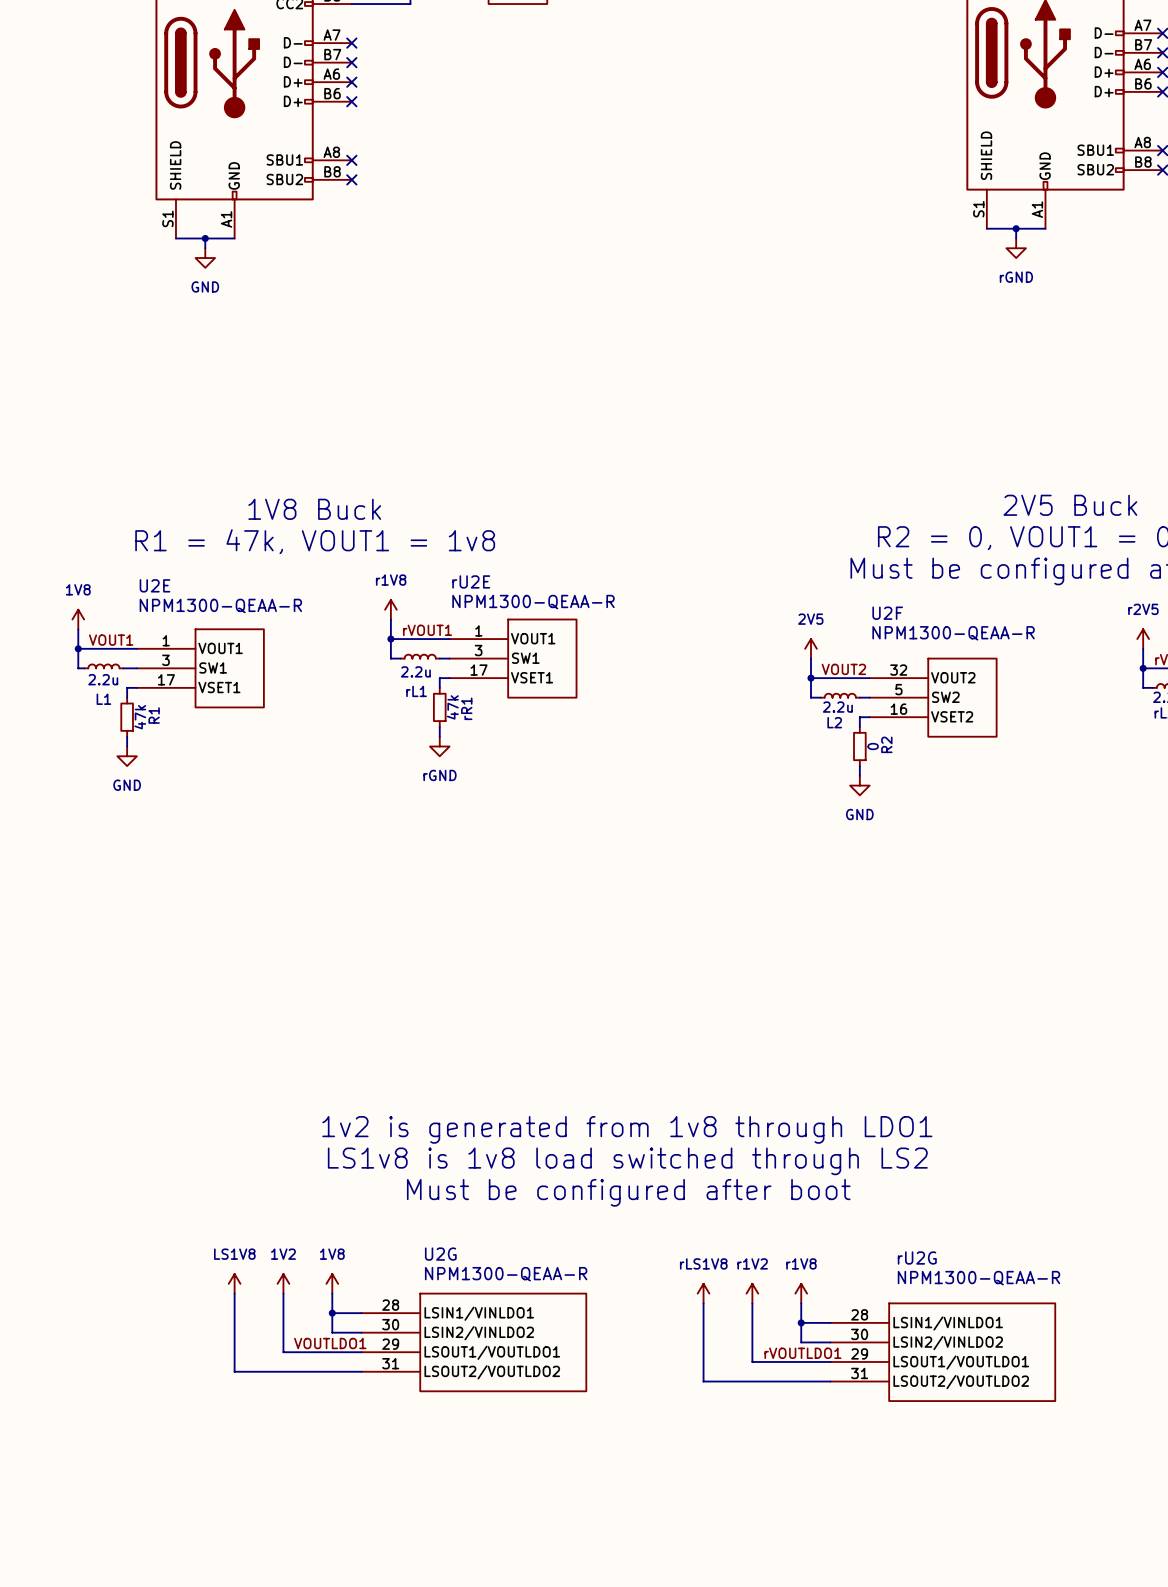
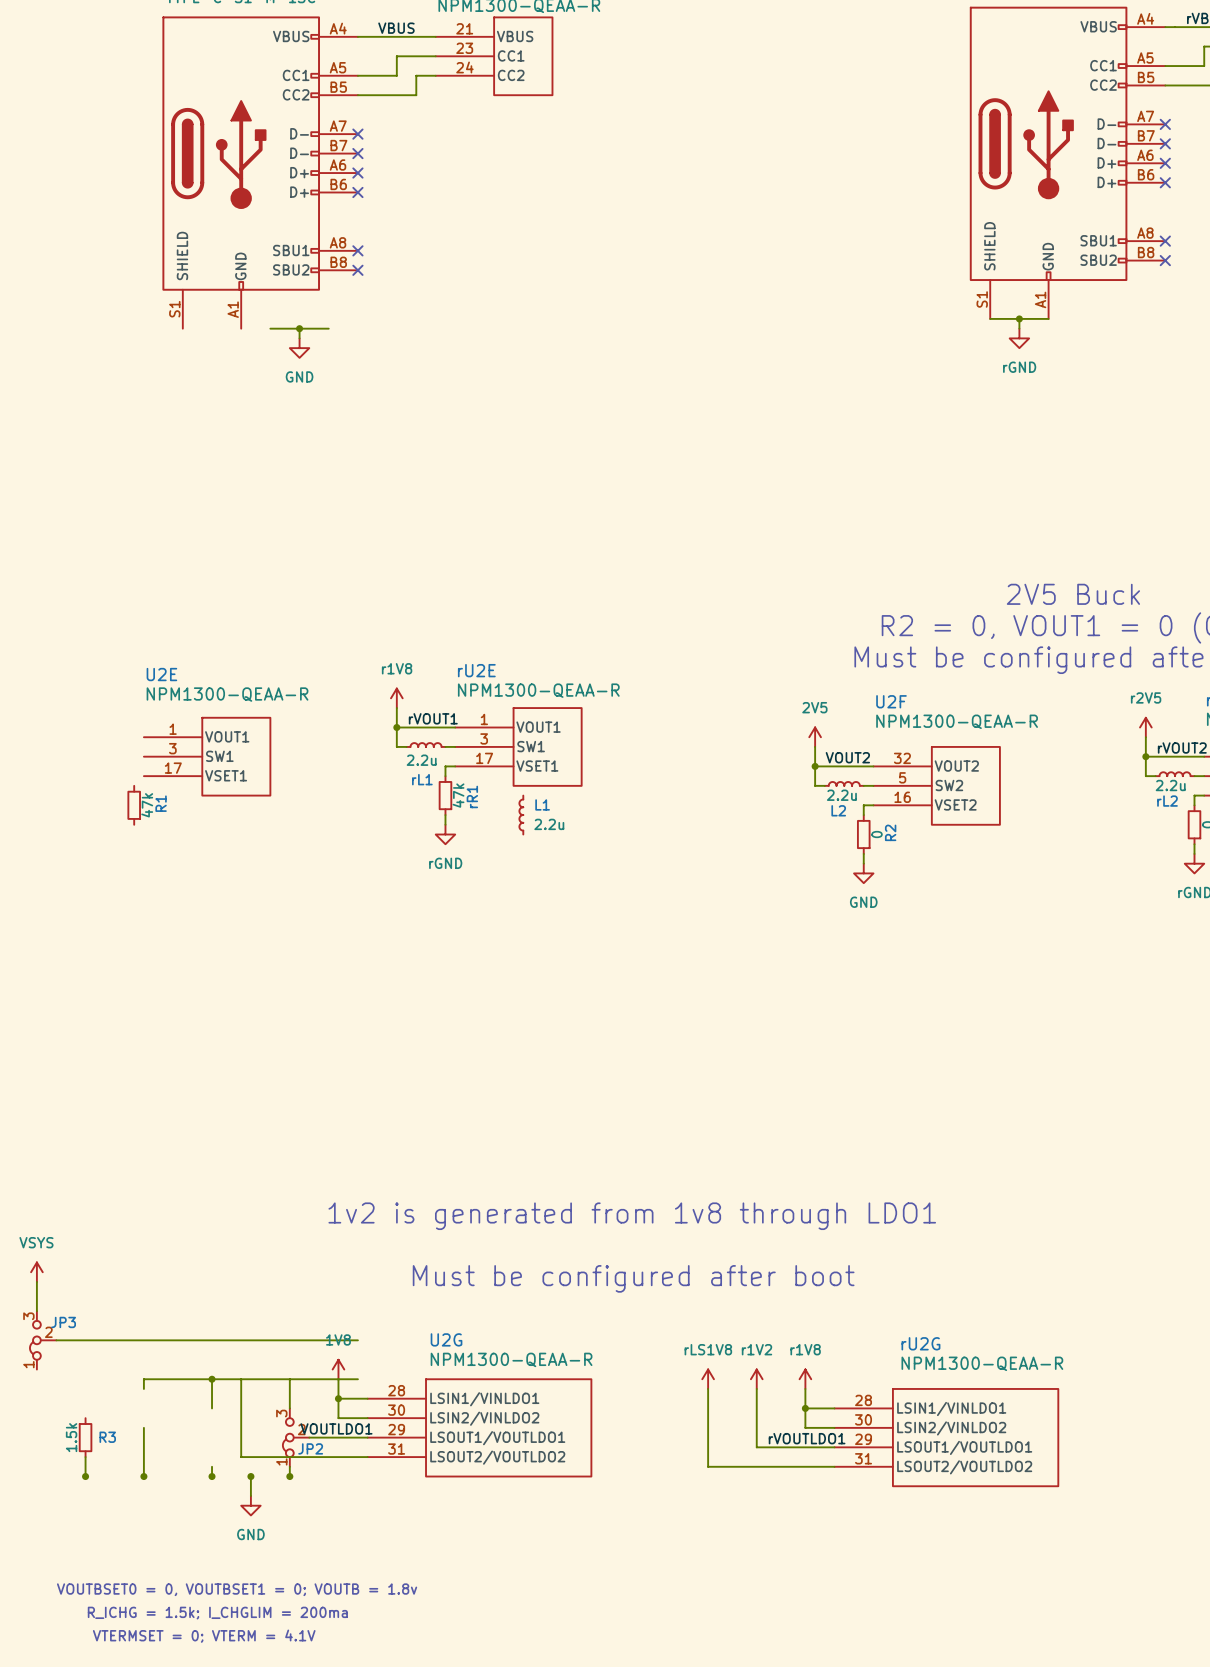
wire: (175, 238) (234, 238) -> (270, 328) (328, 328)
wire: (205, 238) (205, 248) -> (299, 328) (299, 338)
junction: (205, 238) -> none
junction: none -> (299, 328)
power symbol position: GND (205, 258) -> GND (299, 348)
text: 1V8 Buck (314, 509) -> none
text: R1 = 47k, VOUT1 = 1v8 (315, 541) -> none
power symbol: 1V8 (78, 619) -> none
wire: (78, 629) (78, 668) (84, 668) -> none
label: VOUT1 (111, 640) -> none
wire: (78, 648) (136, 648) -> none
junction: (78, 648) -> none
L1 rotation: 0° (103, 666) -> 90° counterclockwise (521, 815)
L1 position: (103, 666) -> (521, 815)
wire: (123, 668) (136, 668) -> none
L1 value position: 2.2u (103, 679) -> 2.2u (549, 824)
wire: (136, 687) (127, 687) (127, 697) -> none
wire: (127, 736) (127, 746) -> none
power symbol: GND (127, 756) -> none
text: LS1v8 is 1v8 load switched through LS2 (627, 1161) -> none
power symbol: none -> VSYS (36, 1272)
wire: none -> (36, 1281) (36, 1311)
JP3: none -> (43, 1340)
wire: none -> (56, 1340) (357, 1340)
power symbol: LS1V8 (234, 1283) -> none
power symbol: 1V2 (283, 1283) -> none
wire: none -> (212, 1379) (212, 1408)
junction: none -> (212, 1379)
wire: none -> (357, 1379) (143, 1379) (143, 1388)
wire: none -> (143, 1427) (143, 1476)
R3: none -> 1.5k (85, 1437)
JP2: none -> (296, 1437)
wire: none -> (85, 1457) (85, 1476)
wire: none -> (212, 1466) (212, 1476)
wire: none -> (289, 1466) (289, 1476)
junction: none -> (85, 1476)
junction: none -> (143, 1476)
junction: none -> (212, 1476)
wire: none -> (250, 1476) (250, 1495)
junction: none -> (250, 1476)
junction: none -> (289, 1476)
power symbol: none -> GND (250, 1505)
text: none -> VOUTBSET0 = 0, VOUTBSET1 = 0; VOUTB = 1.8v (237, 1589)
text: none -> R_ICHG = 1.5k; I_CHGLIM = 200ma (217, 1613)
text: none -> VTERMSET = 0; VTERM = 4.1V (204, 1636)

